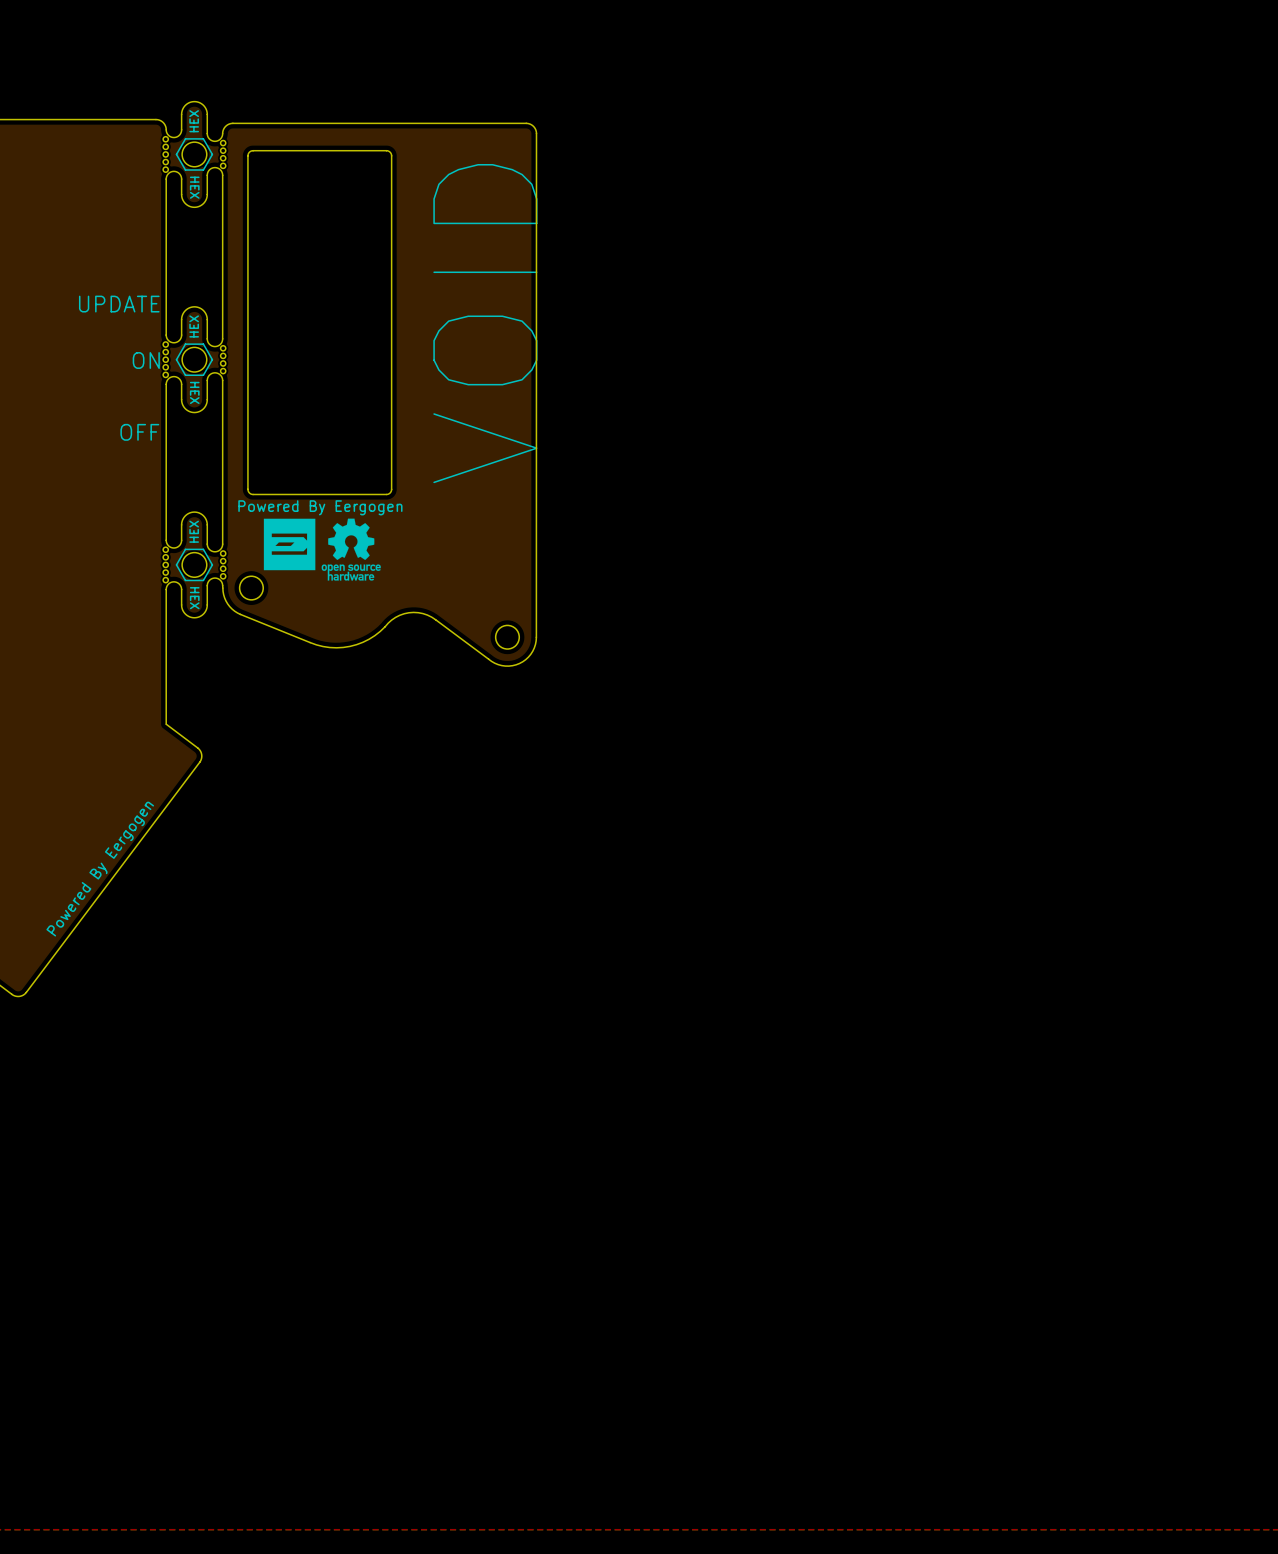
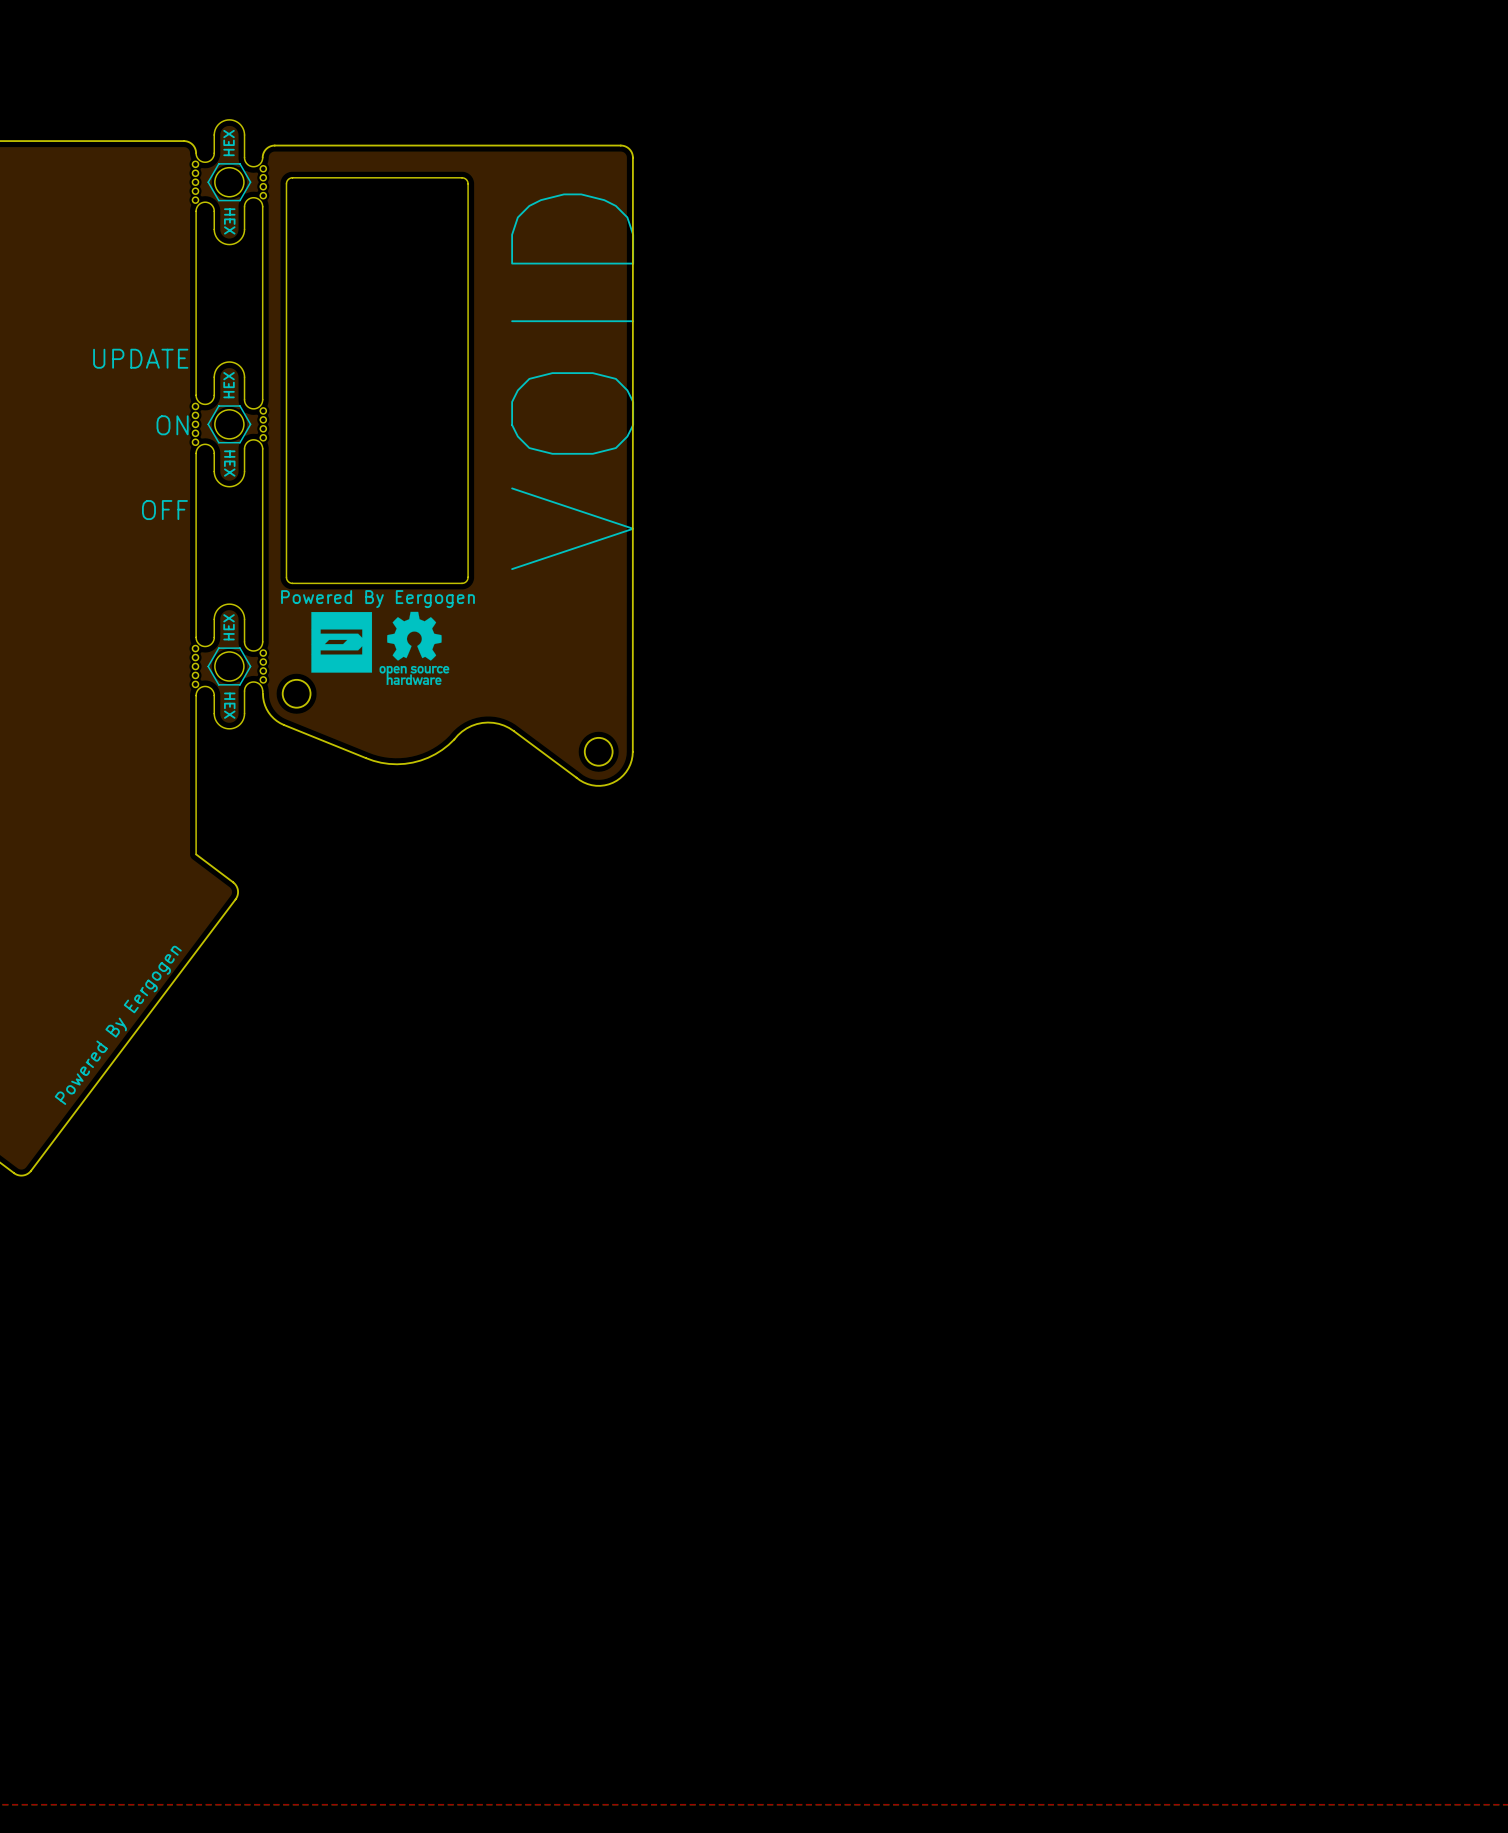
drawing shape: [247, 150, 392, 495] -> [286, 177, 469, 584]

